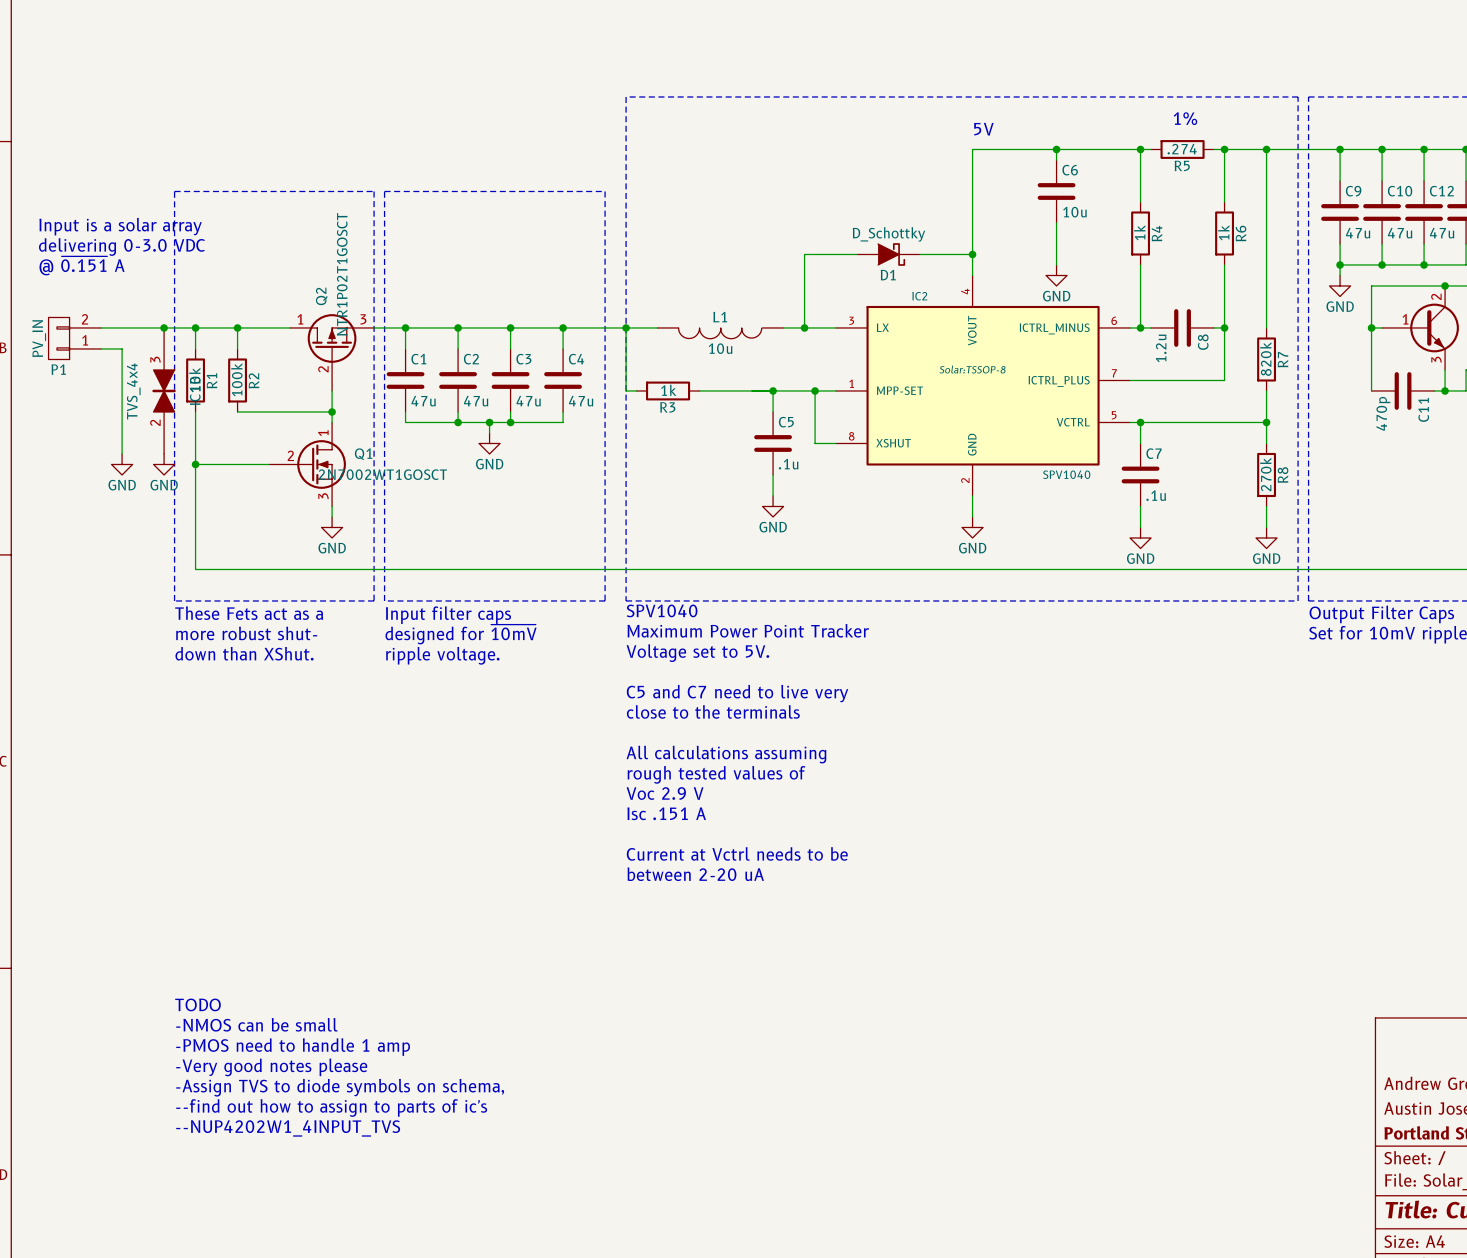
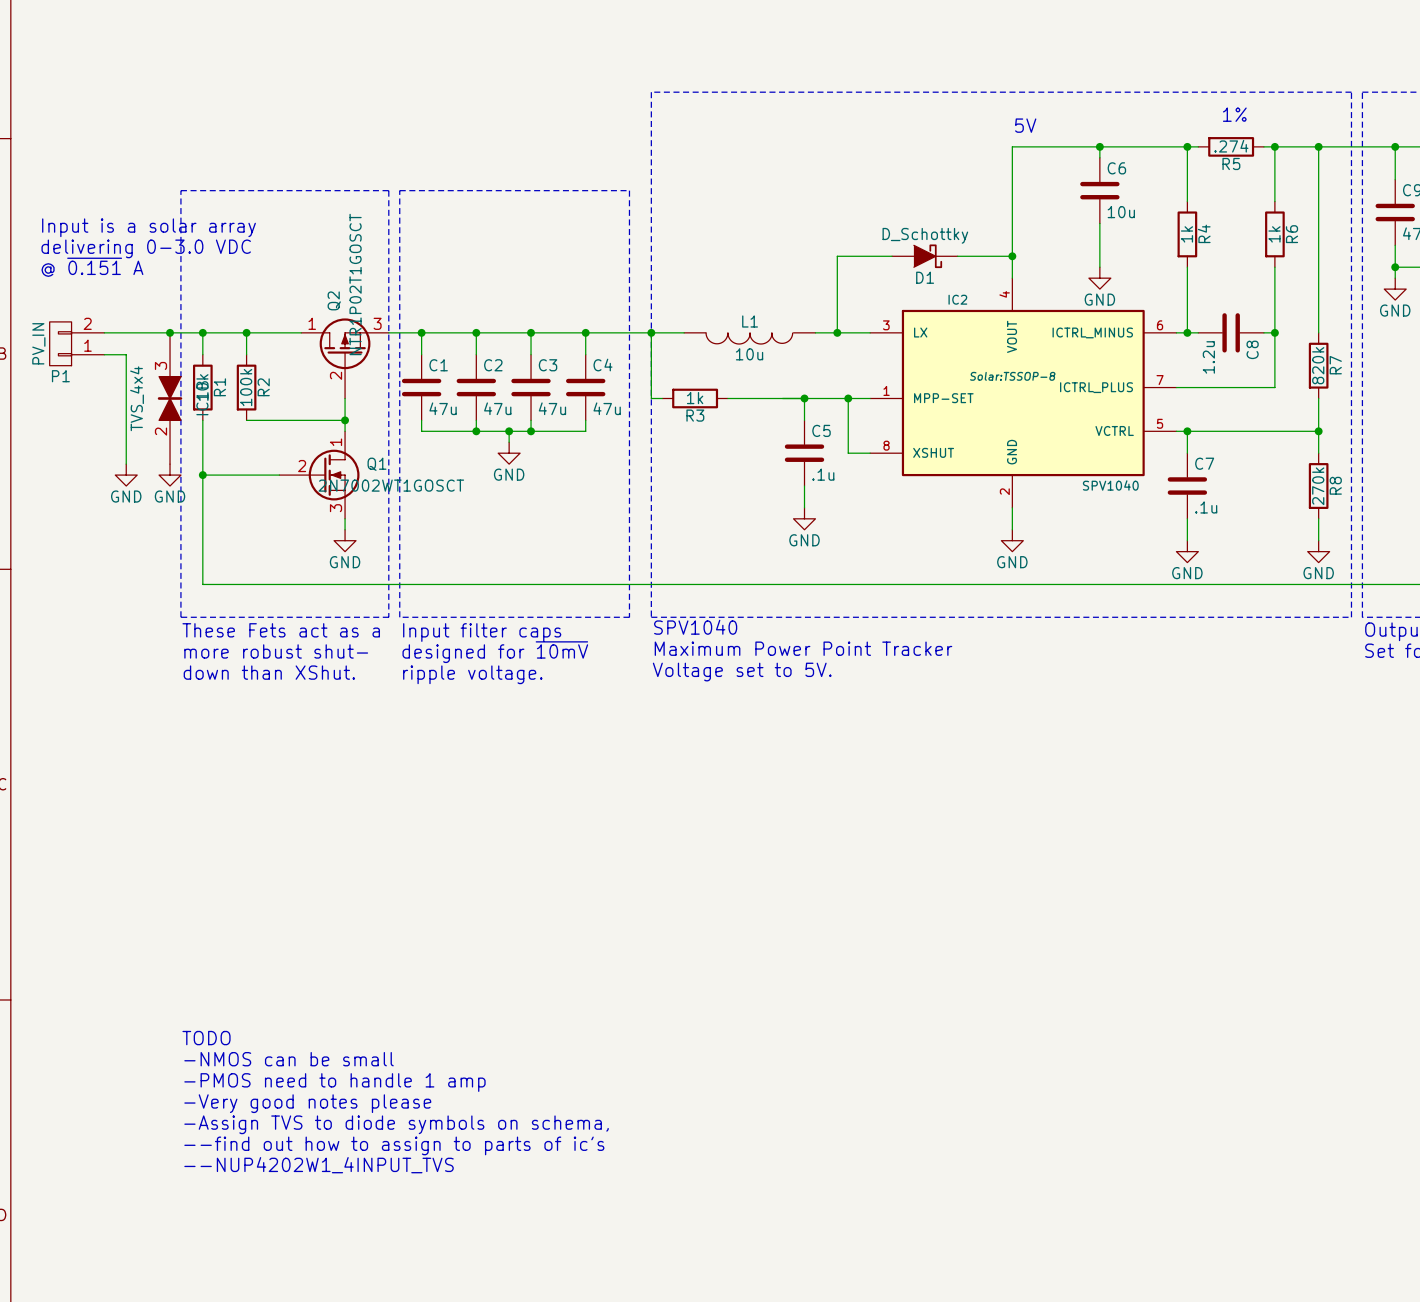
text: C5 and C7 need to live very (737, 693) -> none
text: close to the terminals (713, 711) -> none
text: All calculations assuming (726, 754) -> none
text: rough tested values of (716, 774) -> none
text: Voc 2.9 V (665, 793) -> none
text: Isc .151 A (666, 813) -> none
text: Current at Vctrl needs to be (737, 853) -> none
text: between 2-20 uA (695, 874) -> none

